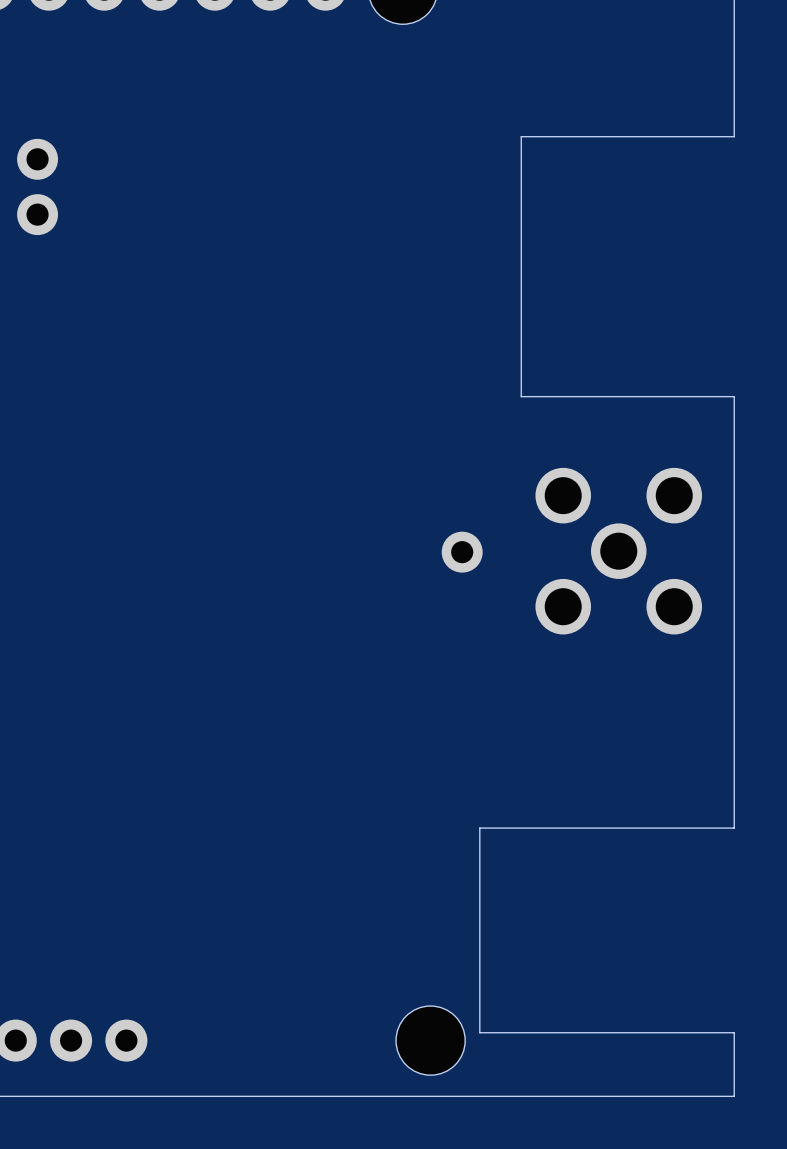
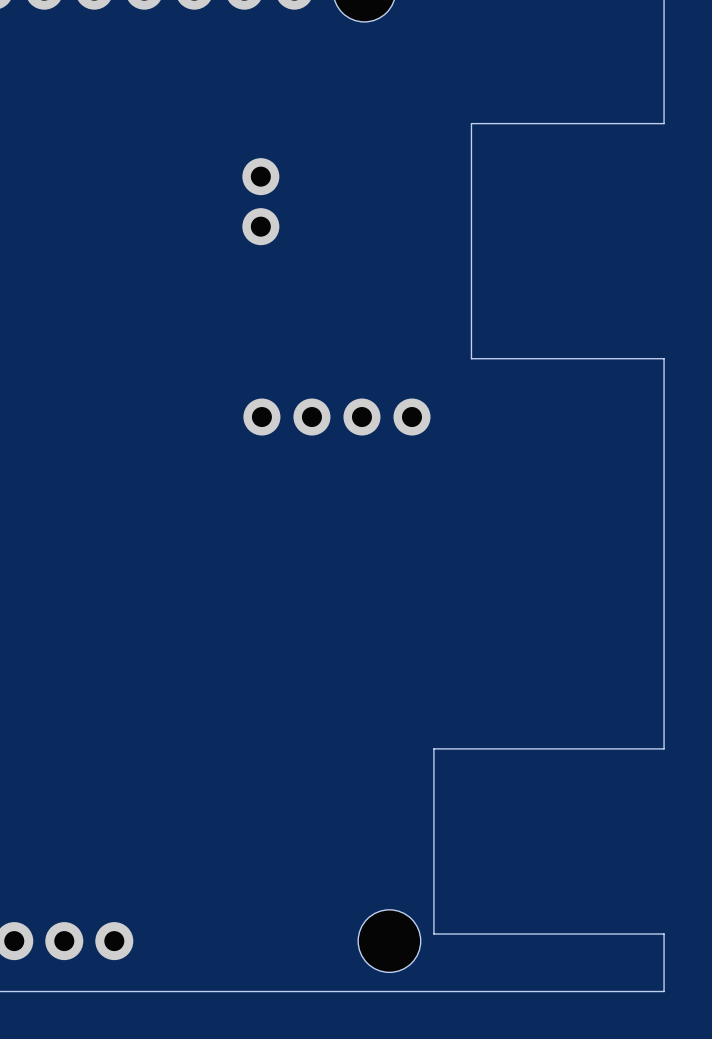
part position: (37, 186) -> (260, 201)
part: none -> (336, 417)
part: (618, 551) -> none
part: (462, 552) -> none

